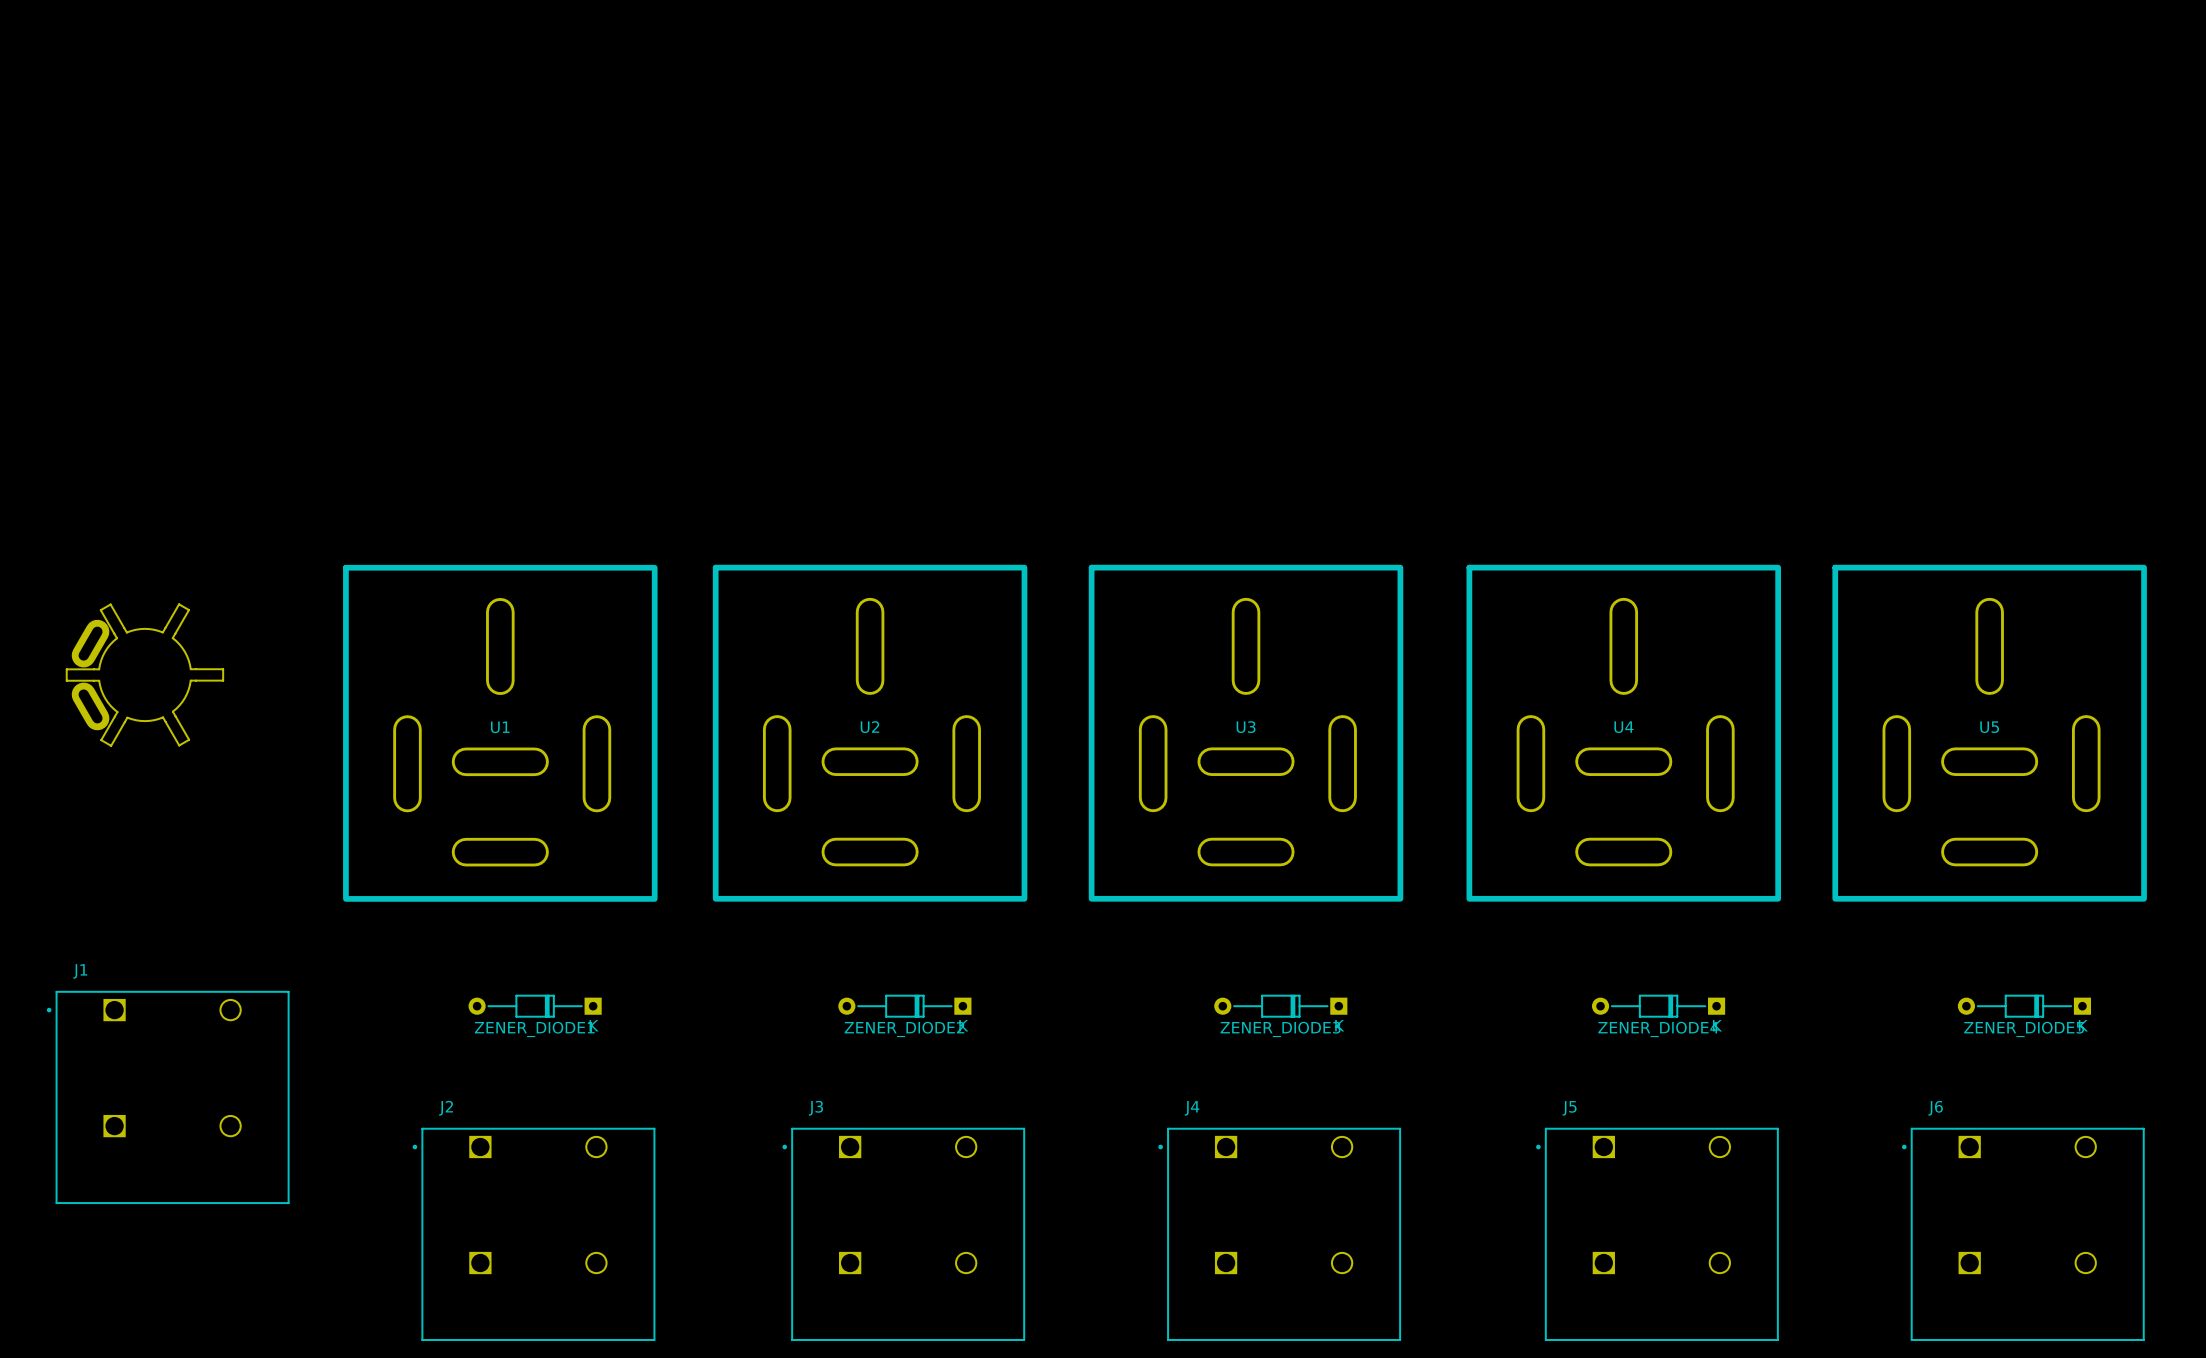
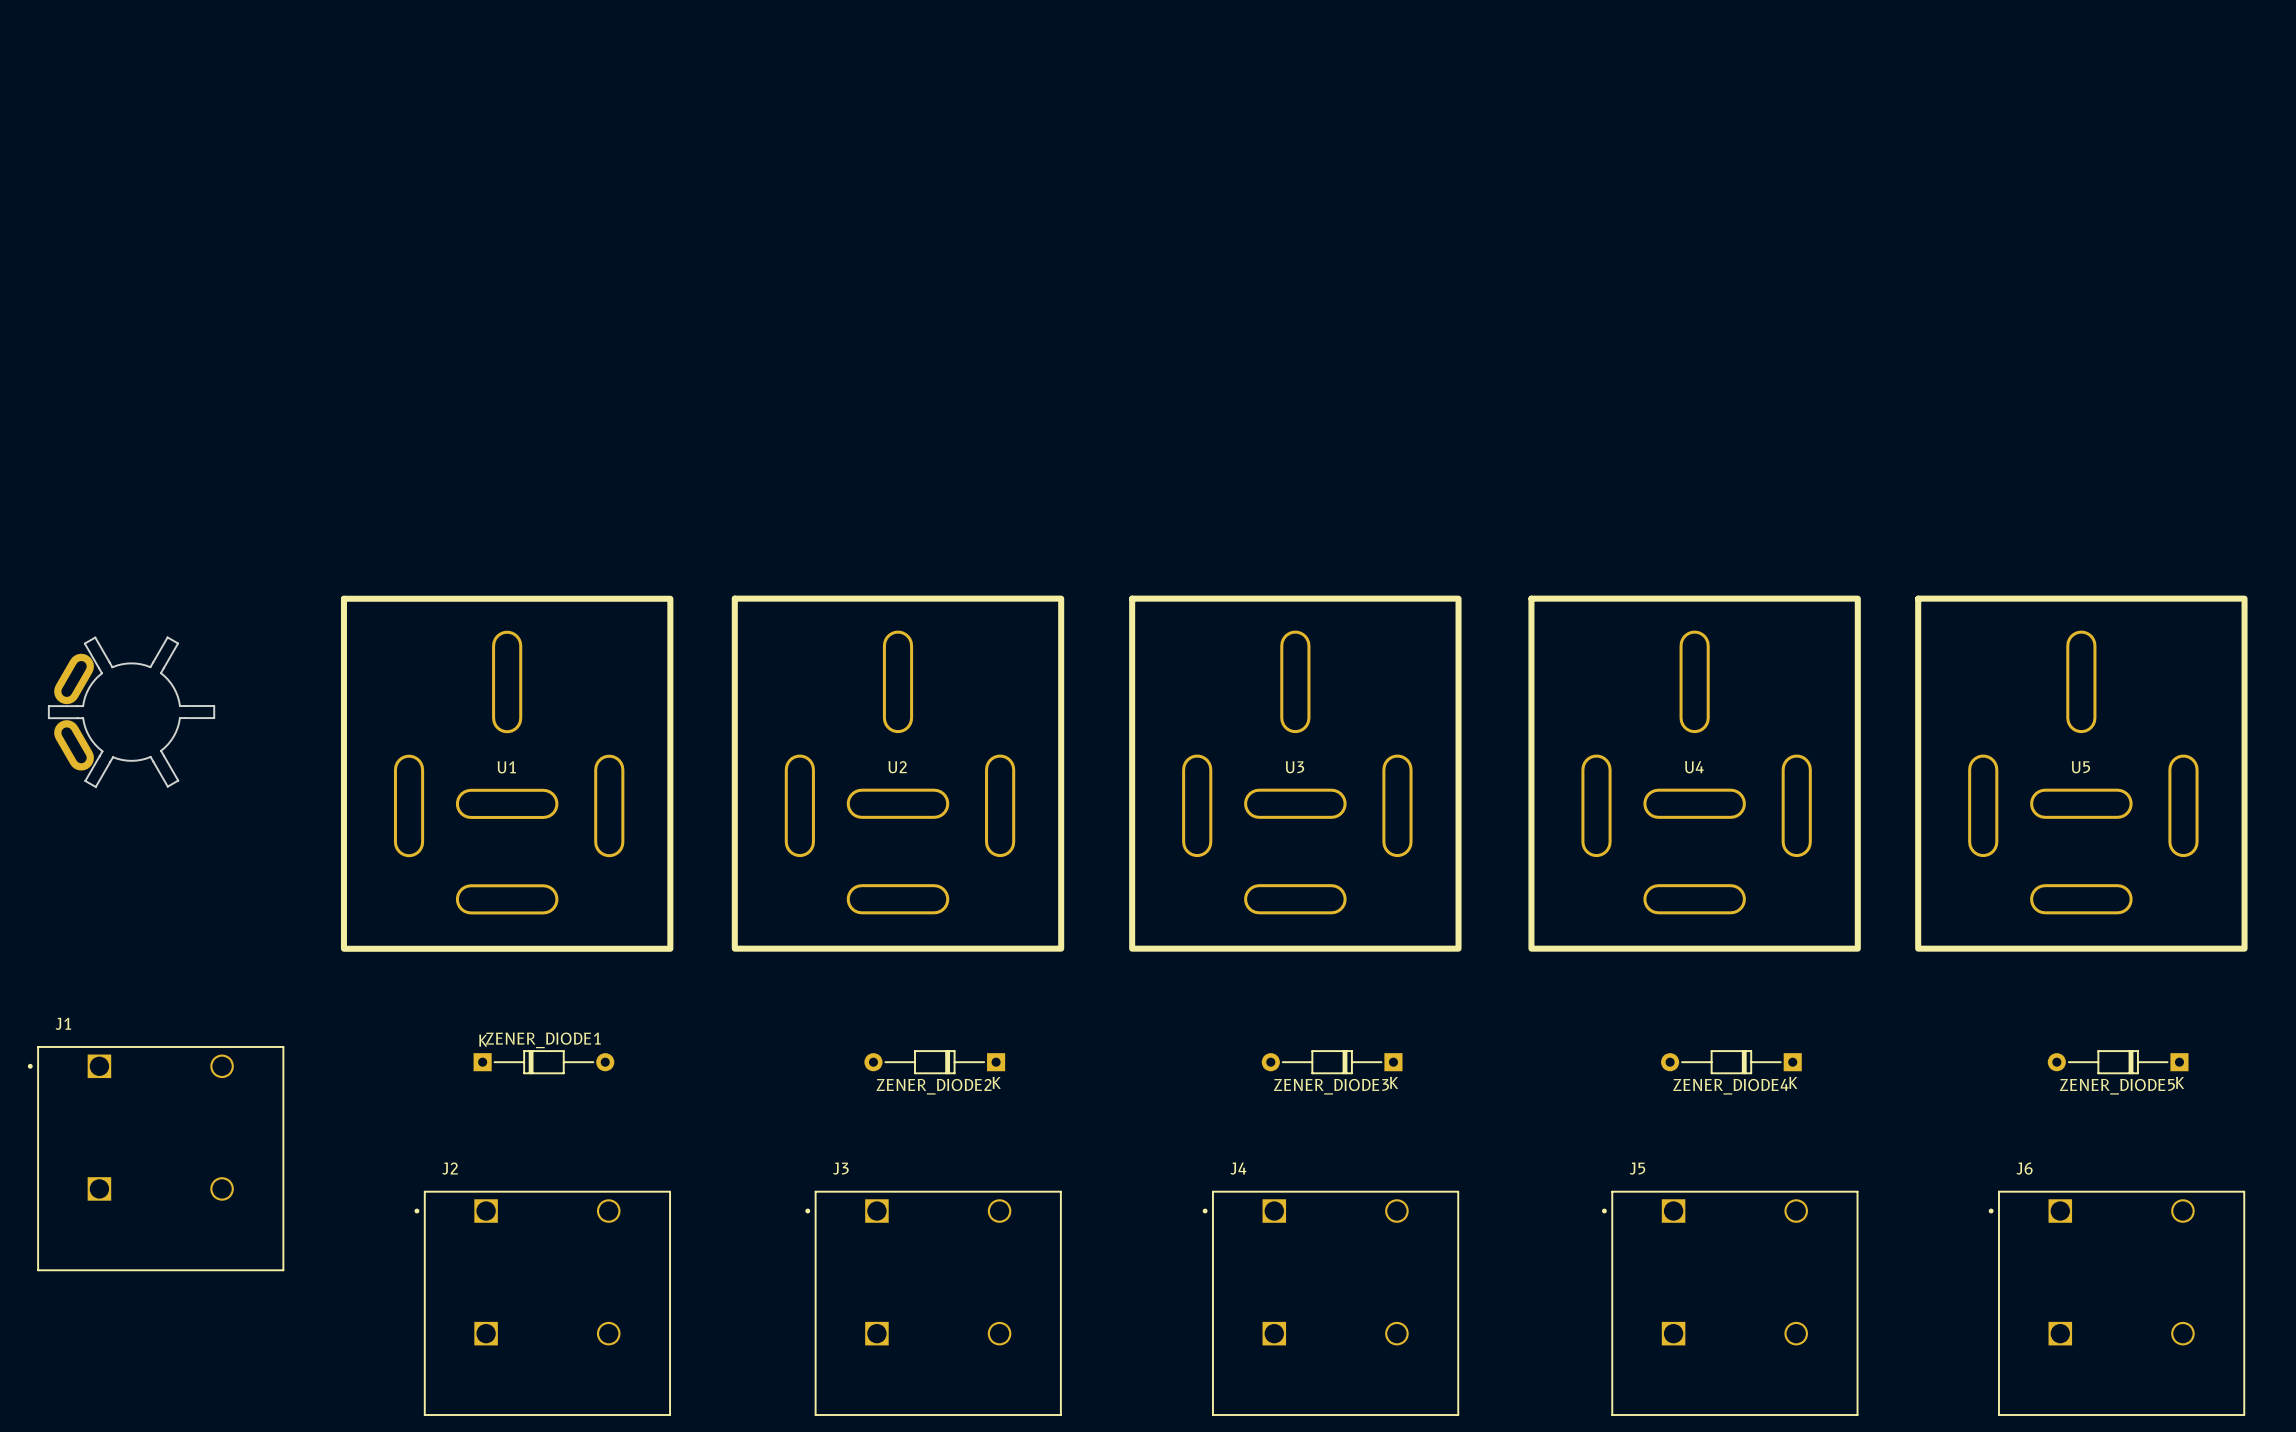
ZENER_DIODE1 rotation: 0° (535, 1006) -> 180° (543, 1062)

